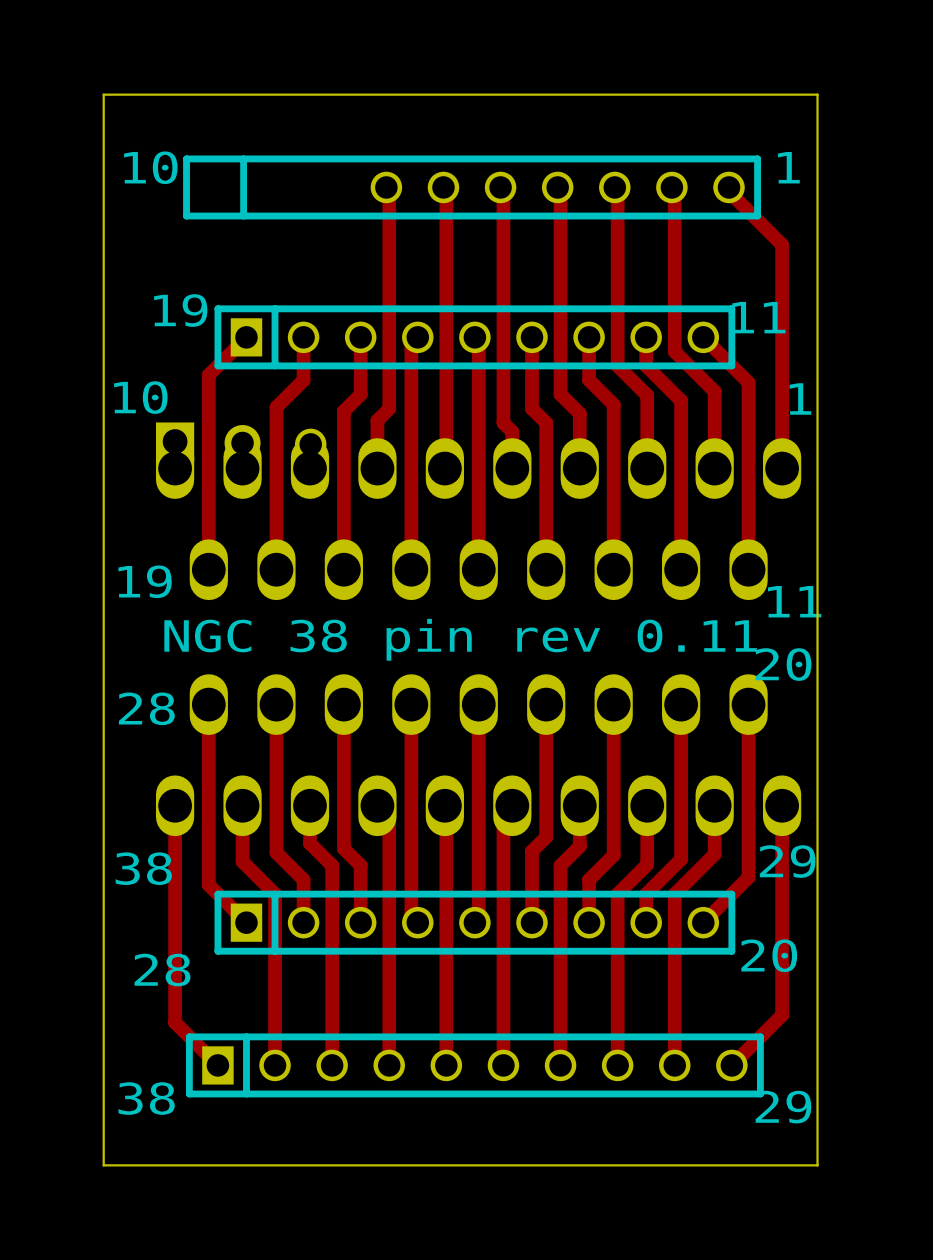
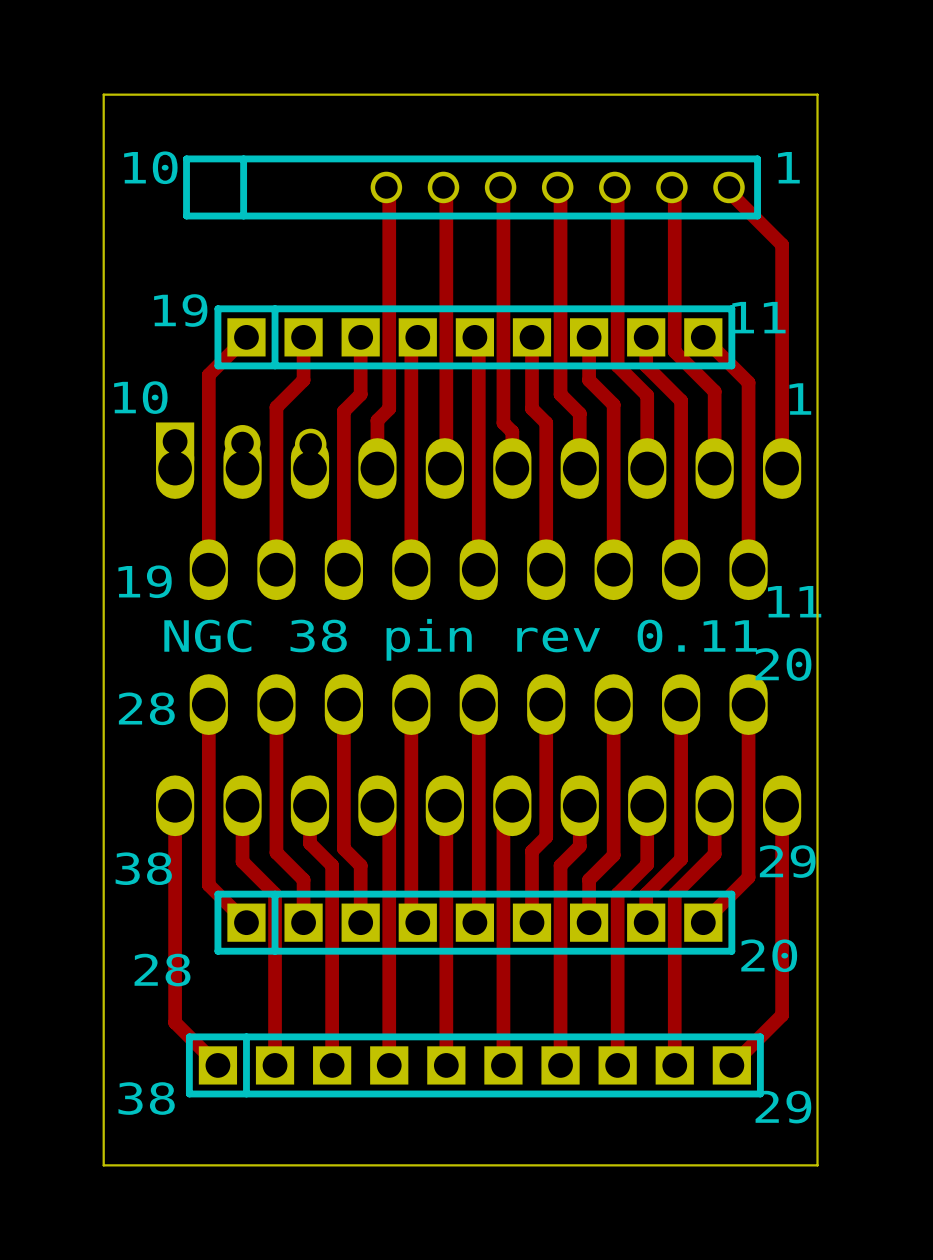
part footprint: [214, 305, 736, 370] -> [214, 305, 736, 370]
part footprint: [214, 890, 736, 955] -> [214, 890, 736, 955]
part footprint: [185, 1033, 764, 1098] -> [185, 1033, 764, 1098]

